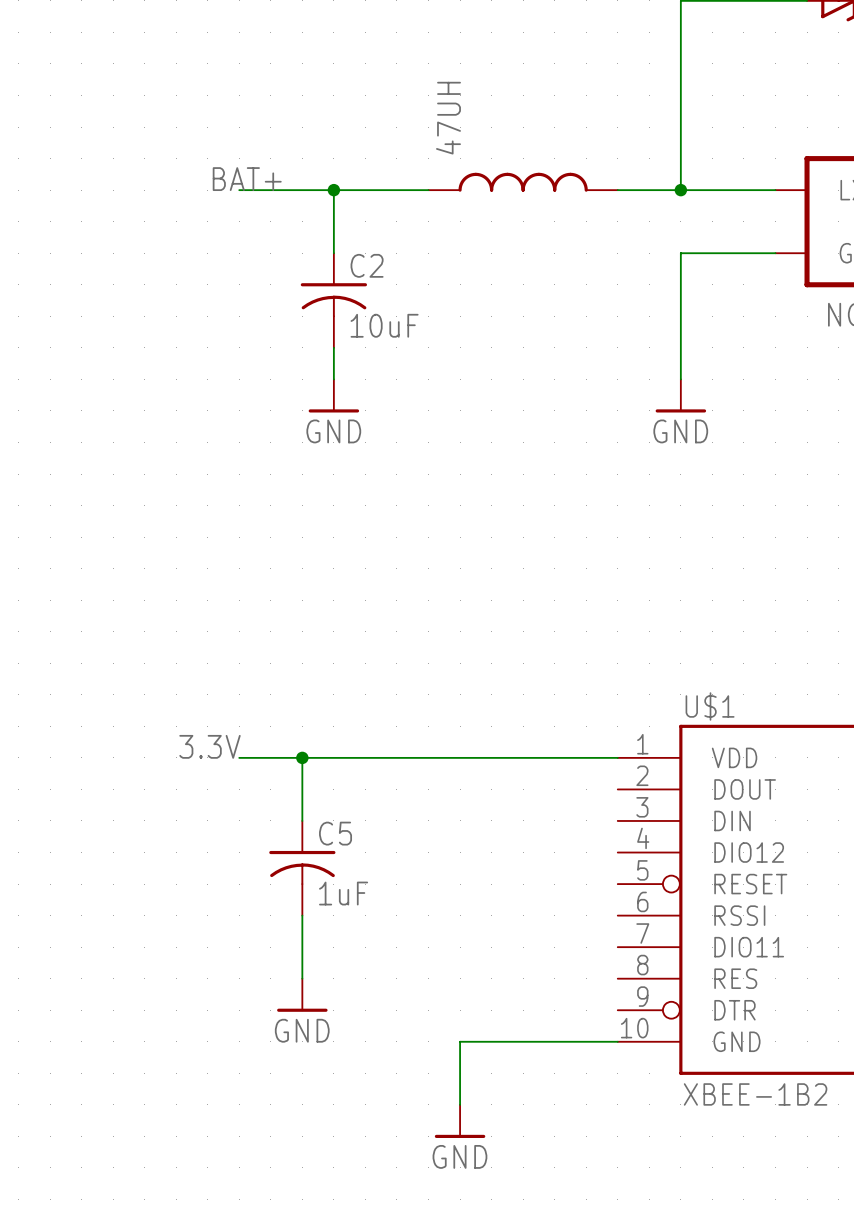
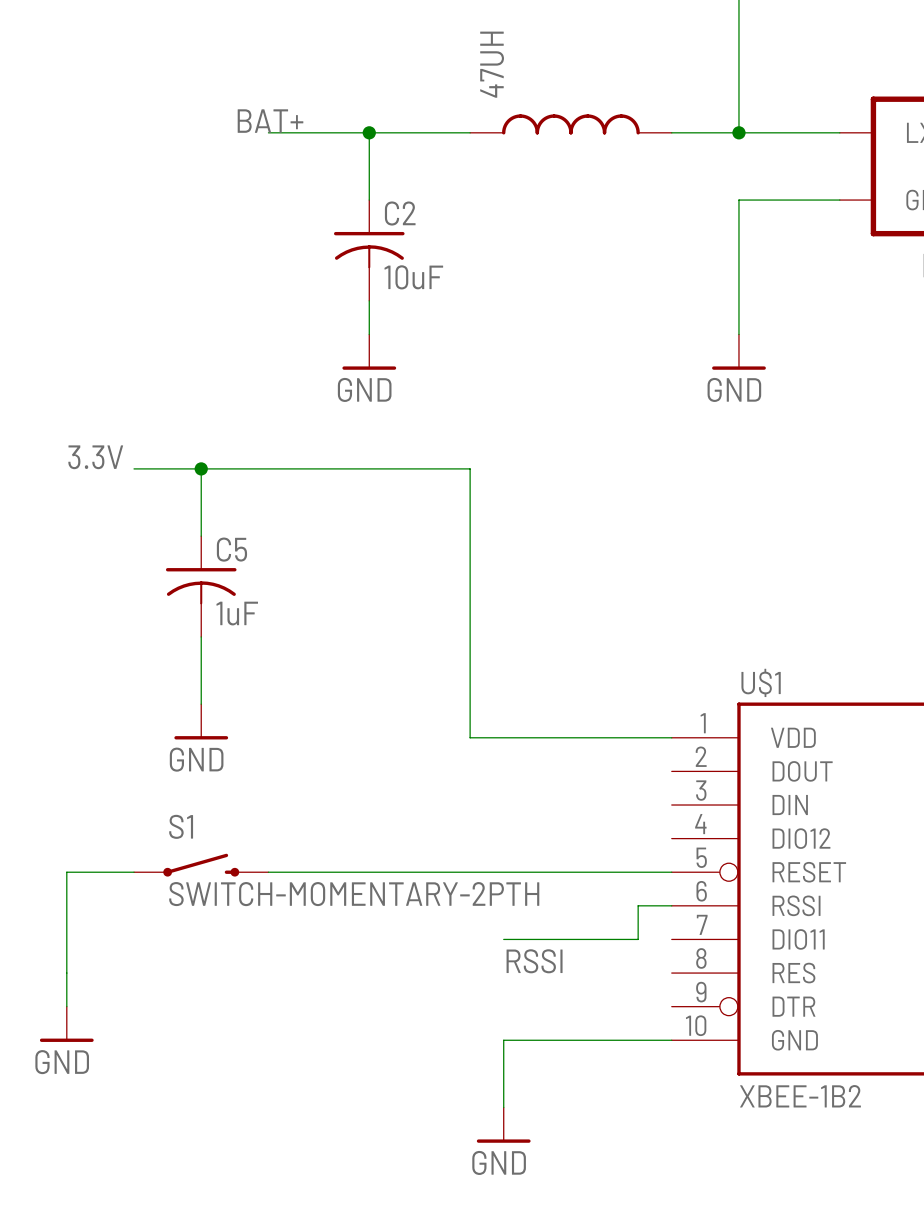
junction: none -> (201, 468)
power symbol: none -> GND (201, 721)
label position: 3.3V (209, 746) -> 3.3V (95, 457)
wire: (239, 757) (428, 757) -> (134, 468) (470, 468) (470, 737)
wire: (302, 757) (302, 820) -> (201, 468) (201, 536)
junction: (302, 757) -> none
C5 position: (302, 868) -> (201, 586)
S1: none -> SWITCH-MOMENTARY-2PTH (201, 865)
wire: none -> (134, 872) (66, 872) (66, 1006)
wire: none -> (268, 872) (671, 872)
wire: (302, 915) (302, 978) -> (201, 636) (201, 704)
wire: none -> (671, 905) (638, 905) (638, 939) (503, 939)
label: none -> RSSI (534, 961)
power symbol: GND (302, 995) -> none
power symbol: none -> GND (66, 1024)

